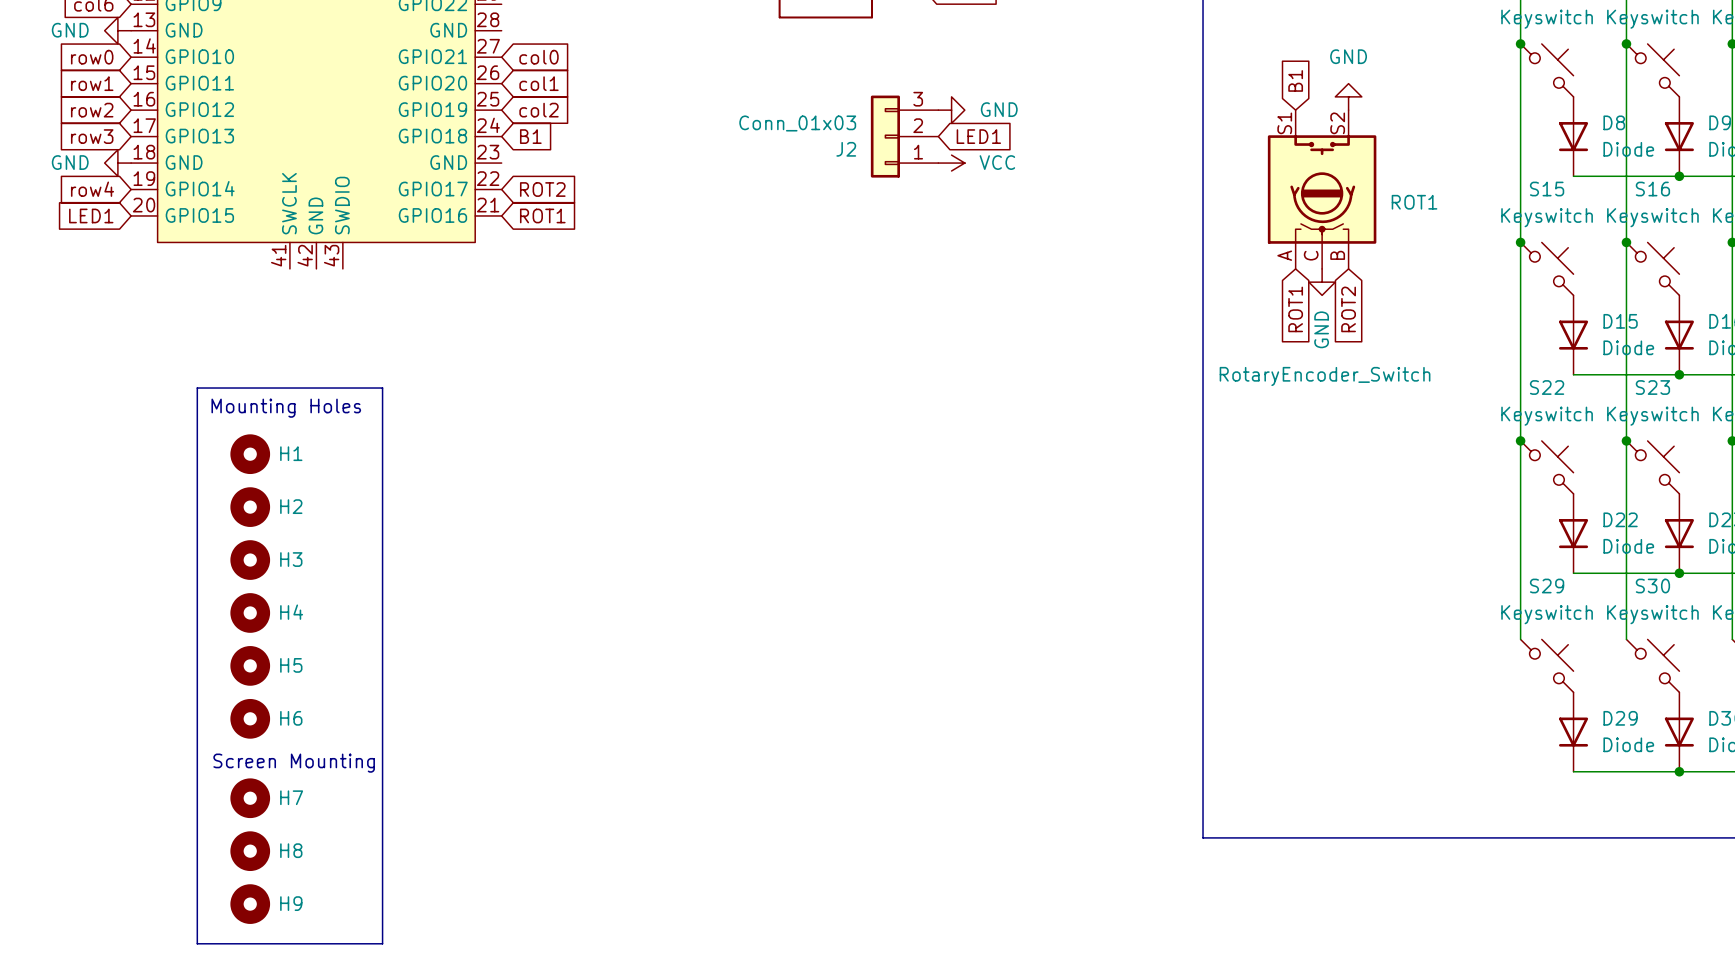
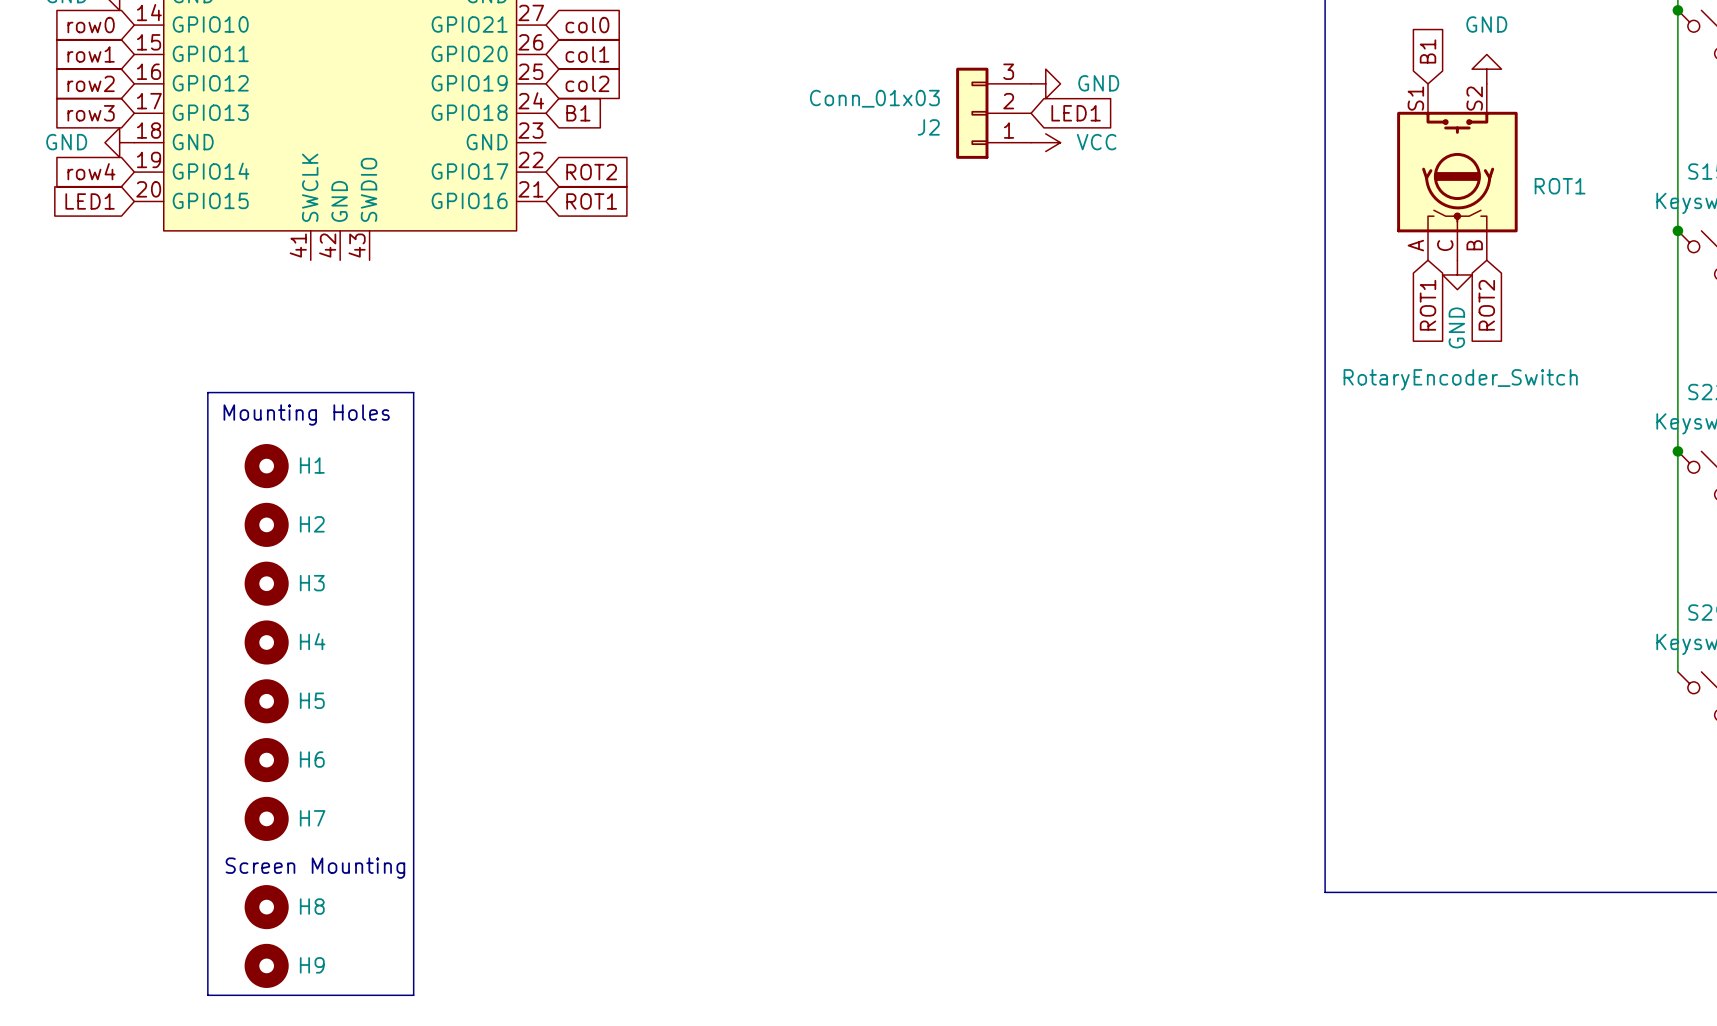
text position: Screen Mounting (294, 763) -> Screen Mounting (315, 868)
H7 position: (250, 798) -> (266, 818)
line: (197, 930) (197, 943) (382, 943) (382, 930) -> (207, 995) (413, 995)

